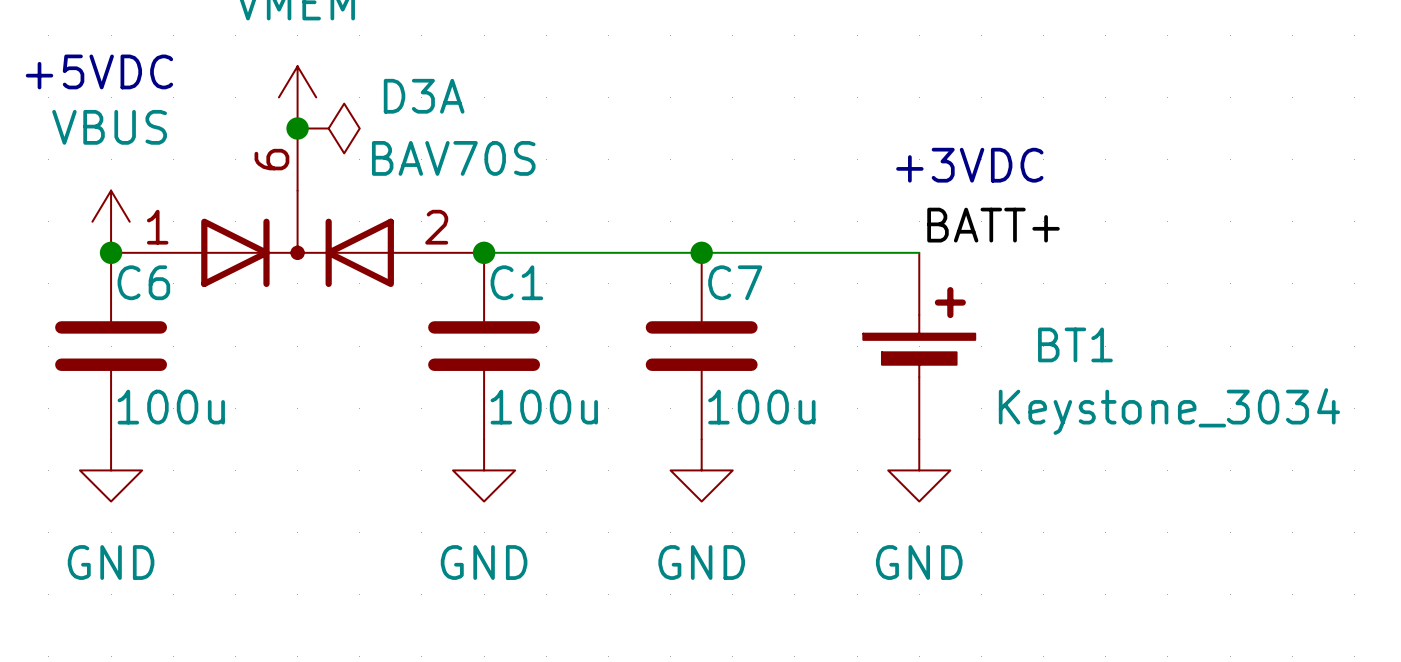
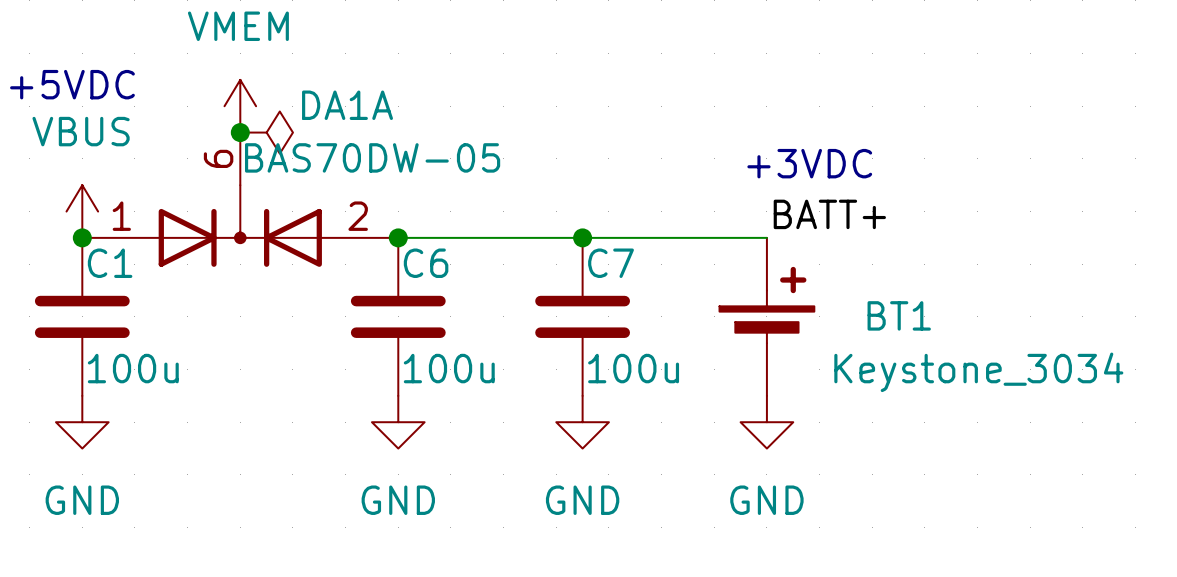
D3A name: D3A (424, 96) -> DA1A (347, 105)
D3A value: BAV70S (453, 158) -> BAS70DW-05 (372, 157)
C6 name: C6 (143, 282) -> C1 (110, 263)
C1 name: C1 (516, 282) -> C6 (426, 263)

